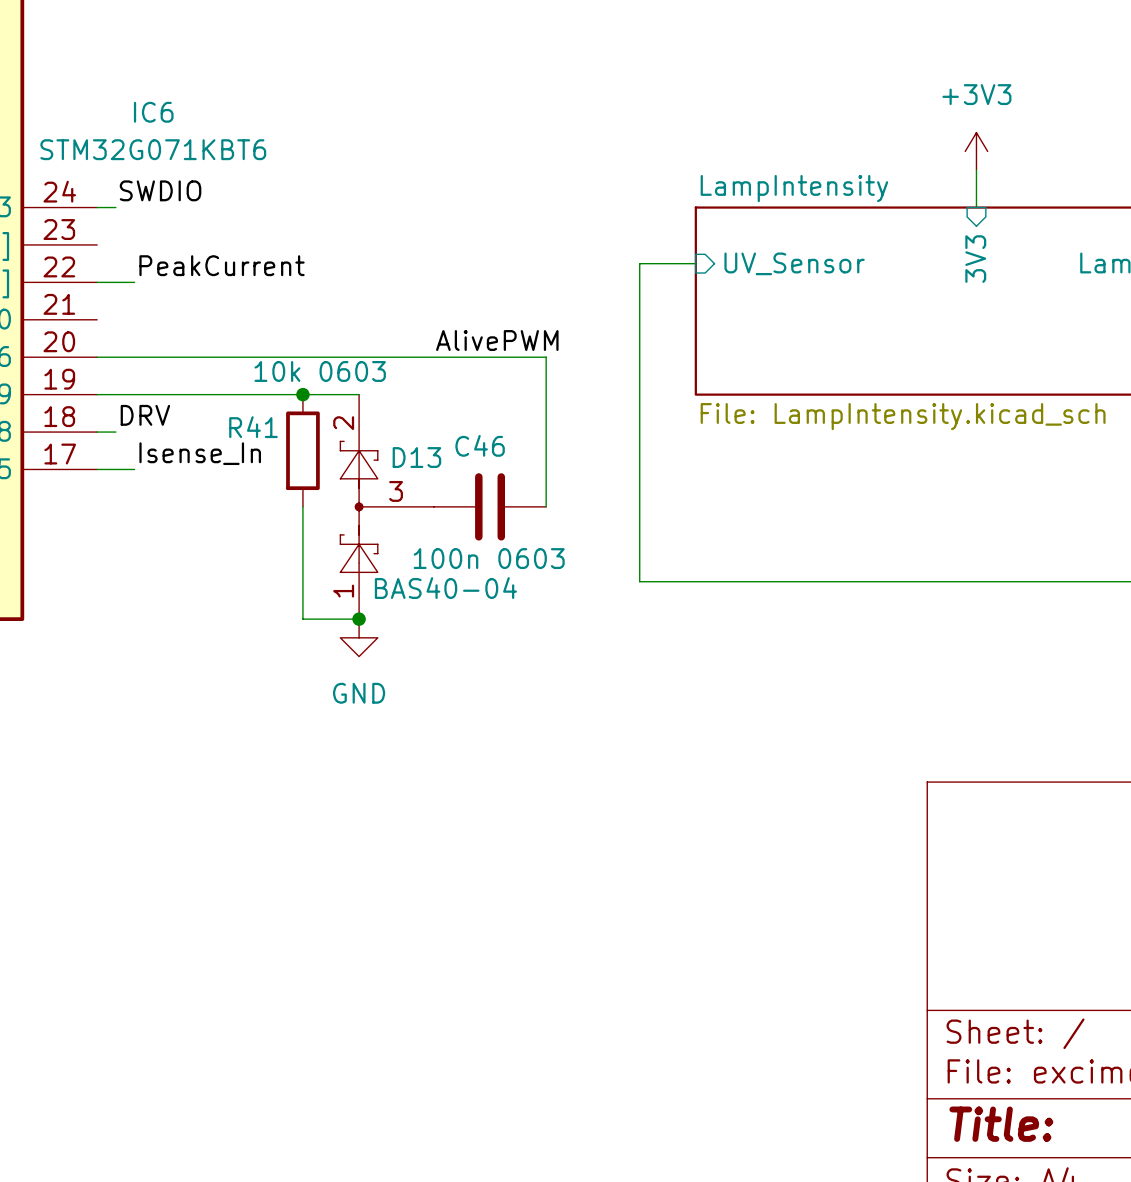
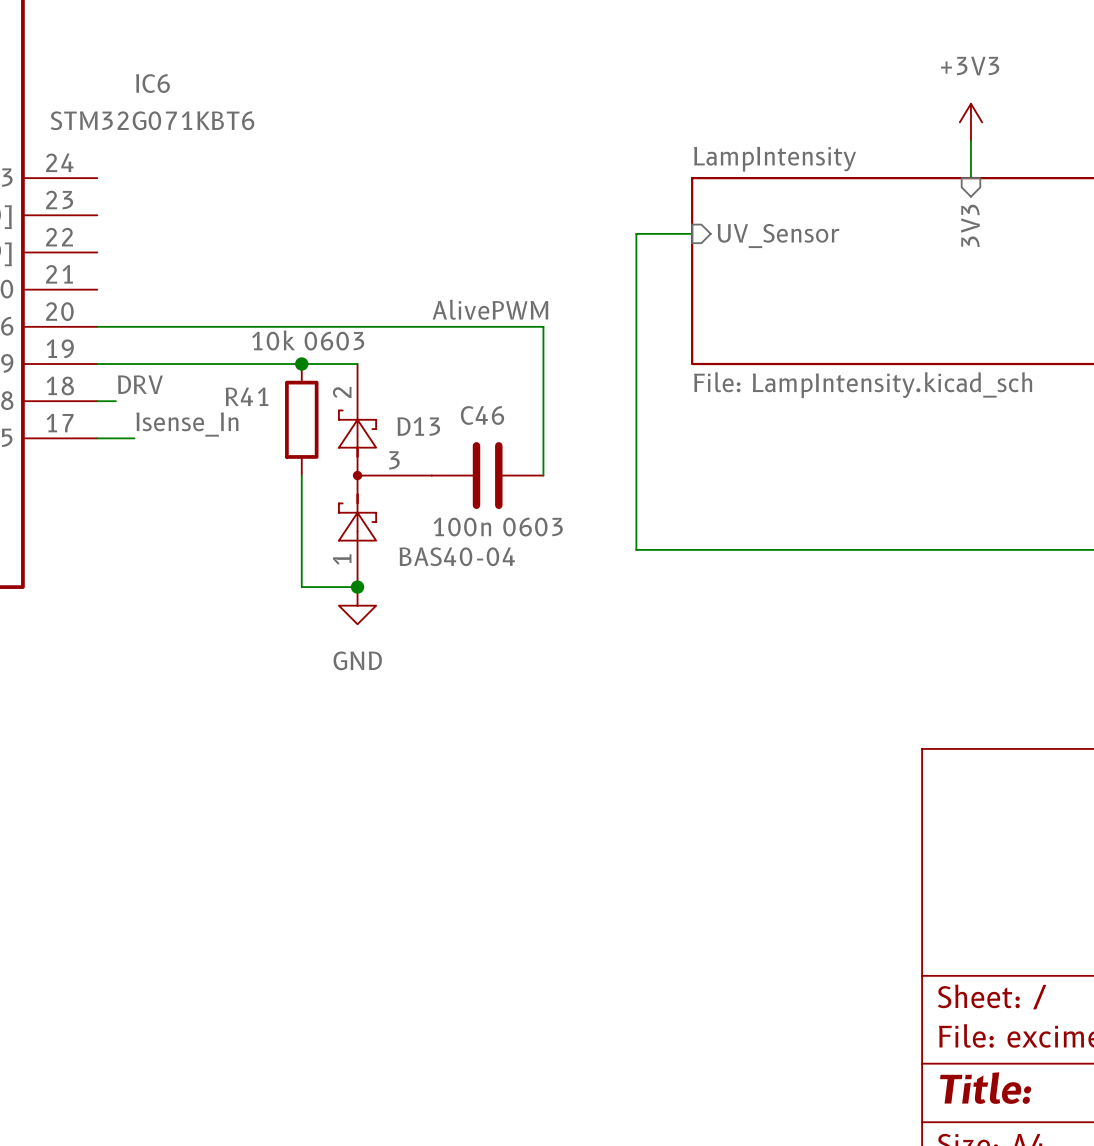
label: SWDIO (160, 190) -> none
wire: (97, 207) (115, 207) -> none
label: PeakCurrent (222, 265) -> none
wire: (97, 282) (134, 282) -> none

